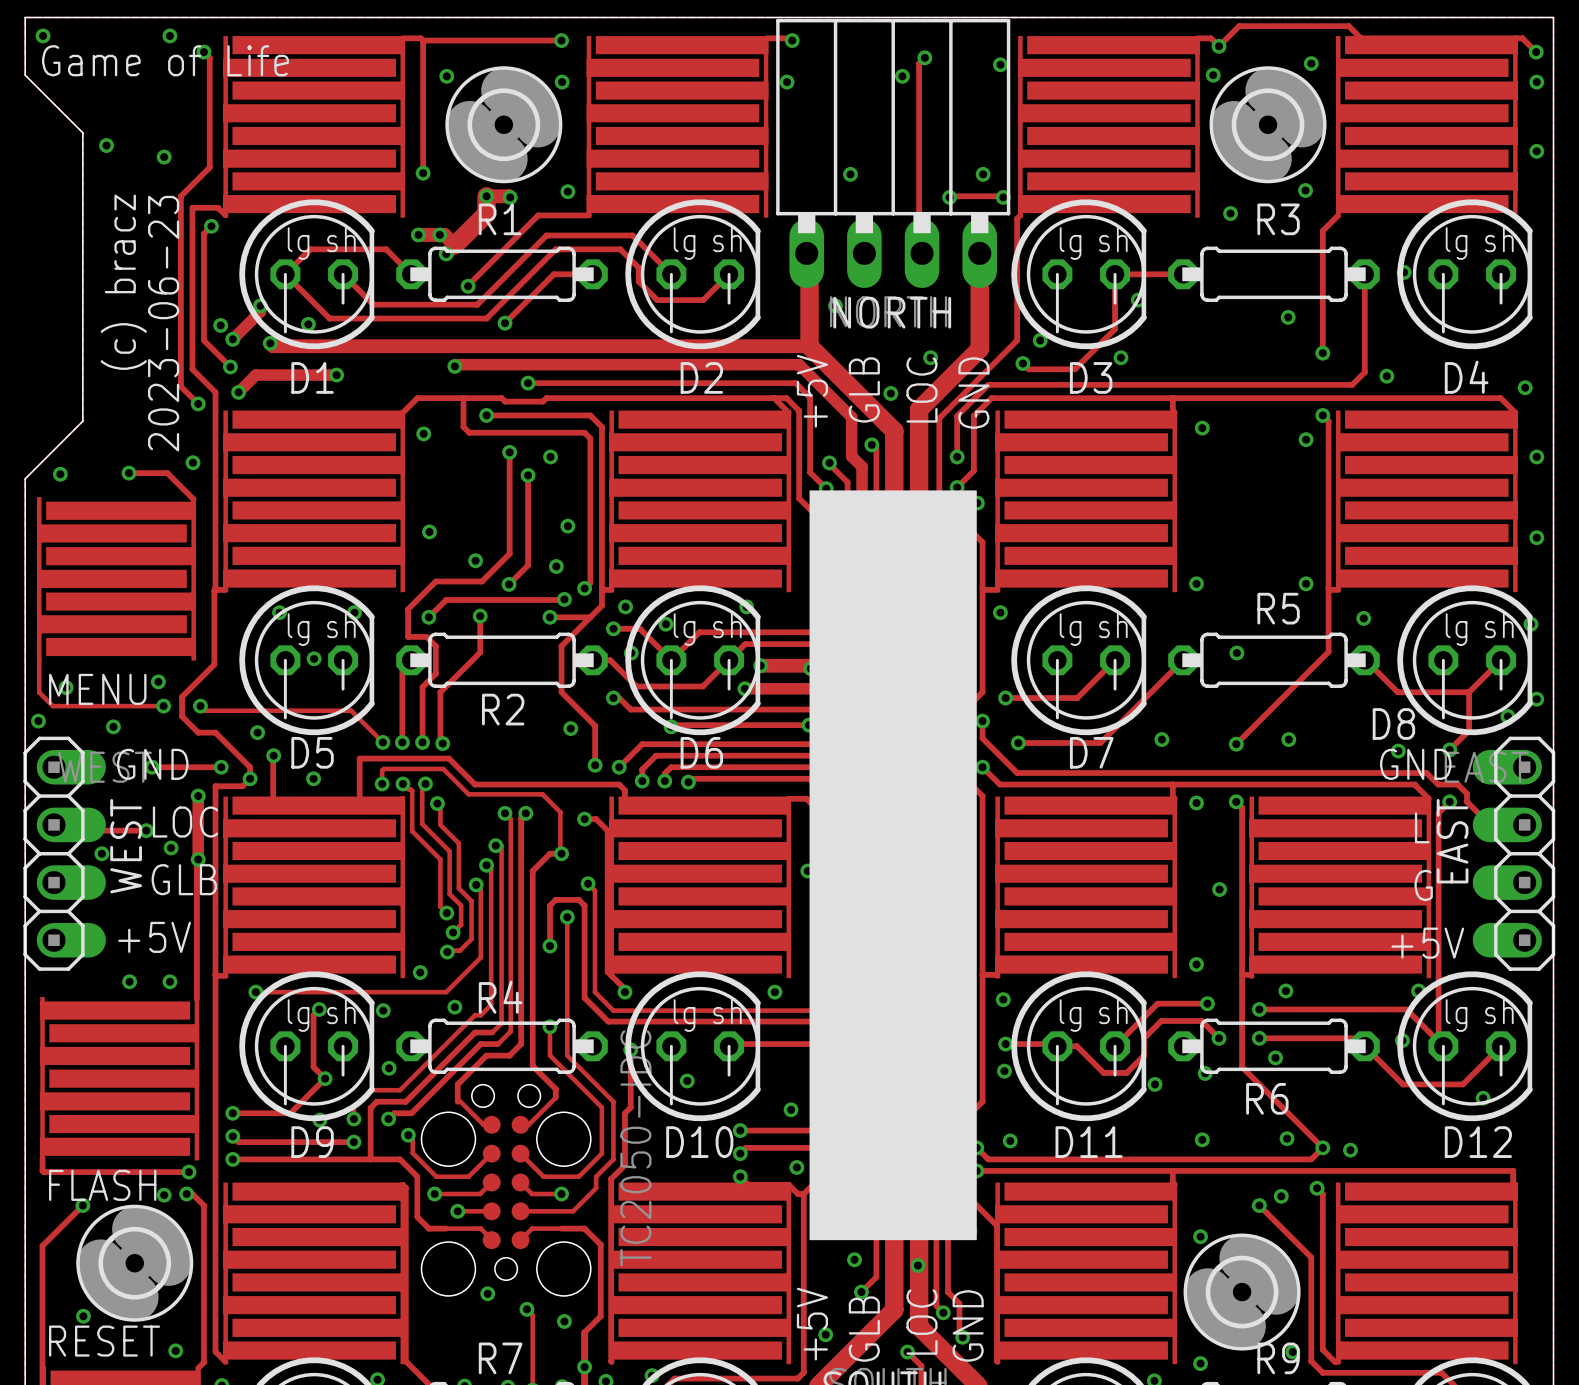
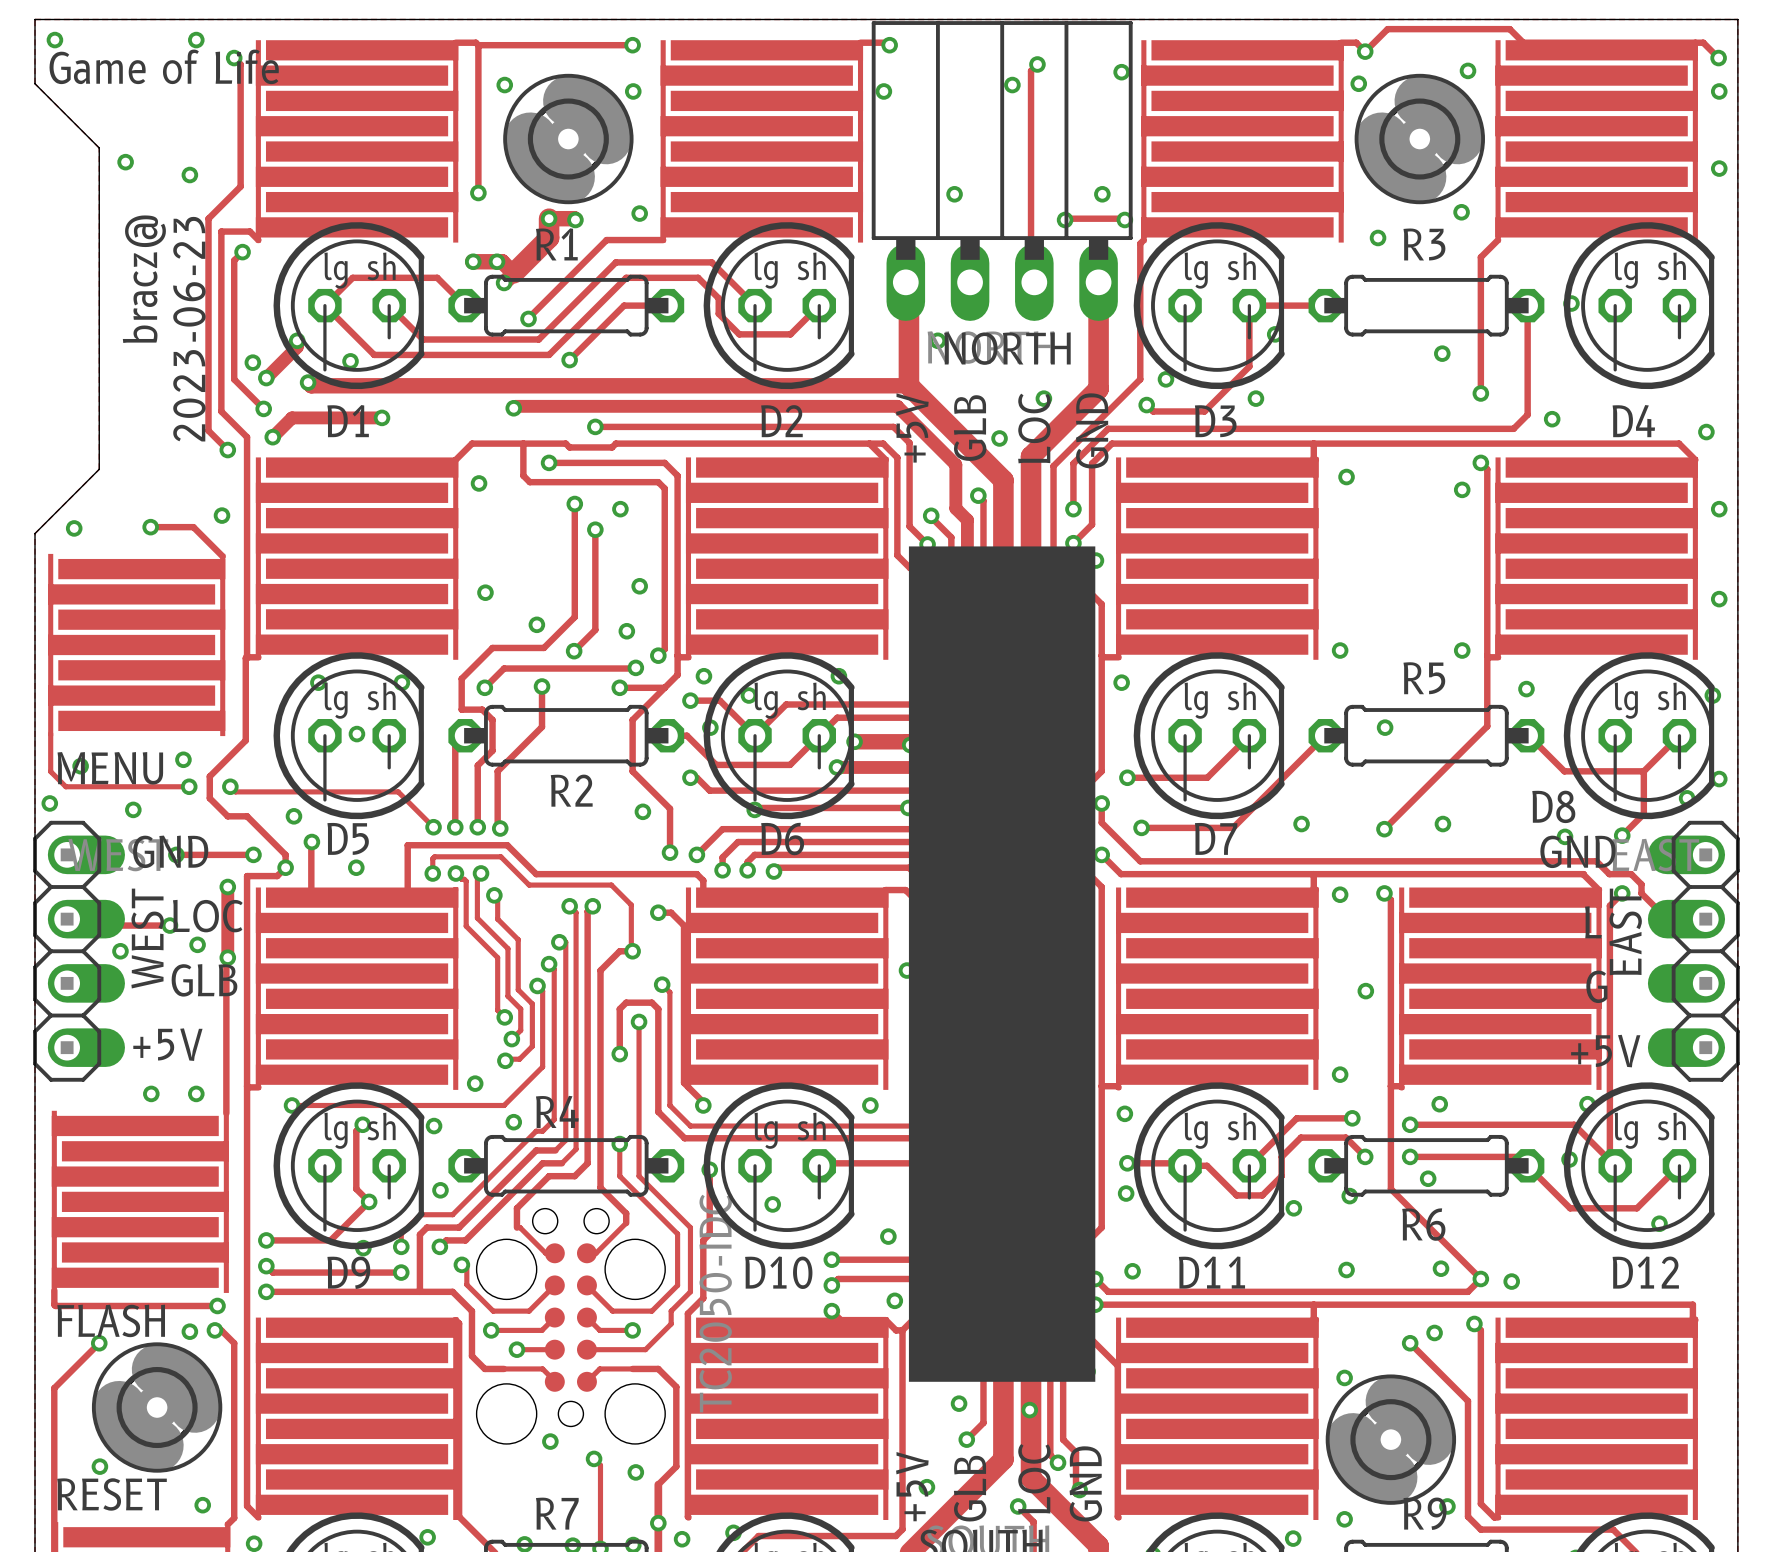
text: (c) bracz (123, 282) -> bracz@ (144, 279)

